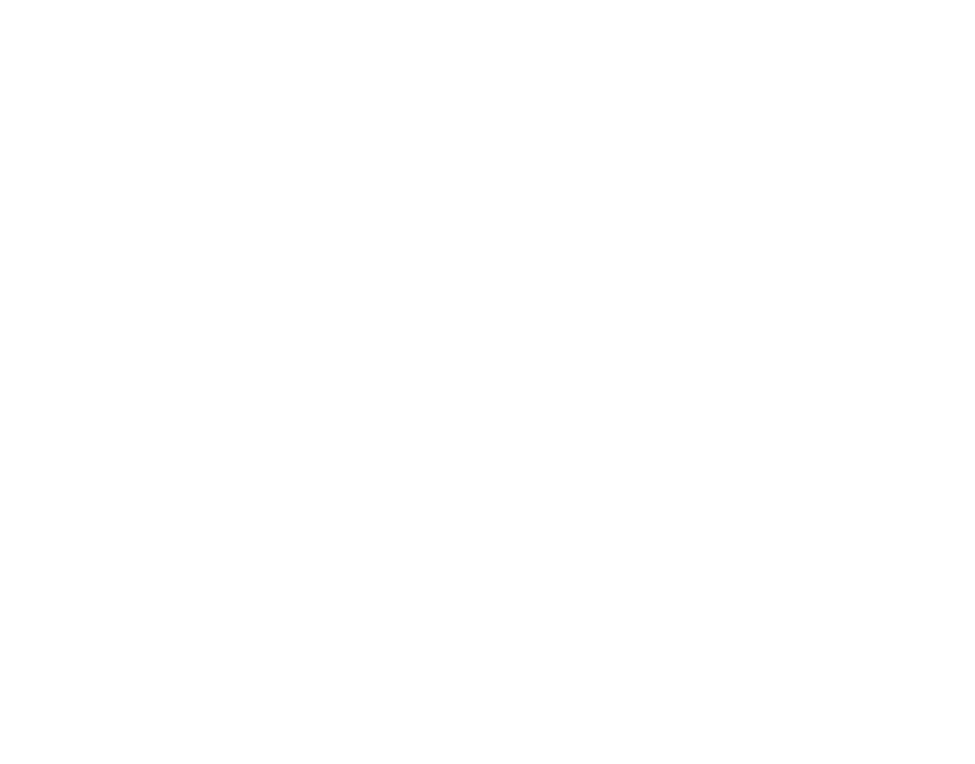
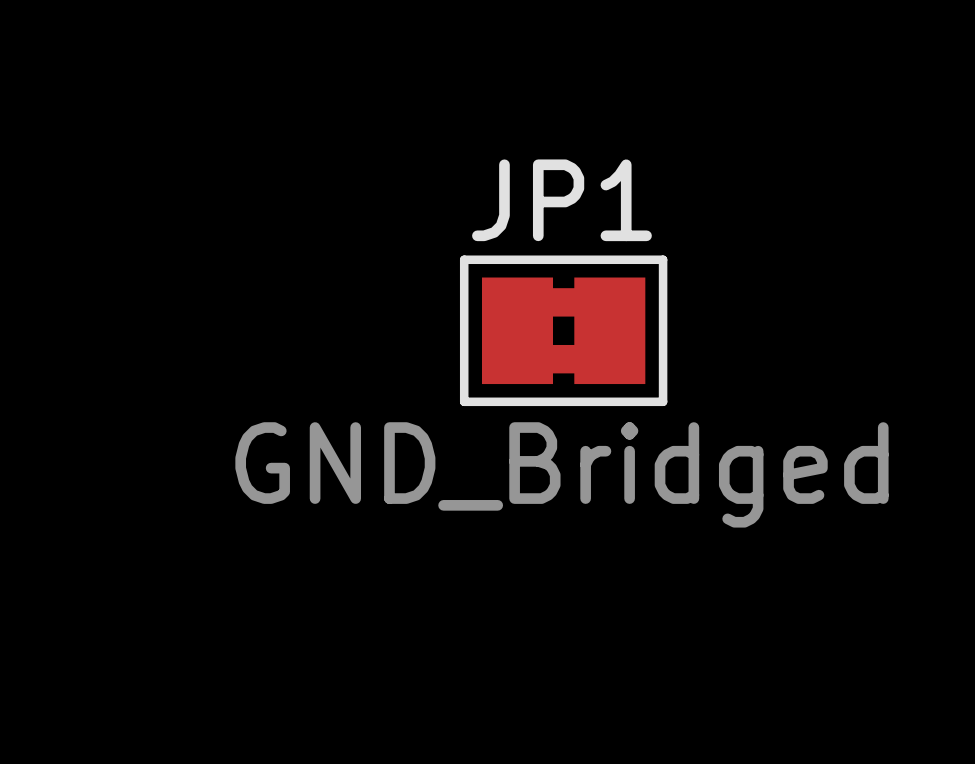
JP1: none -> GND_Bridged (563, 330)

